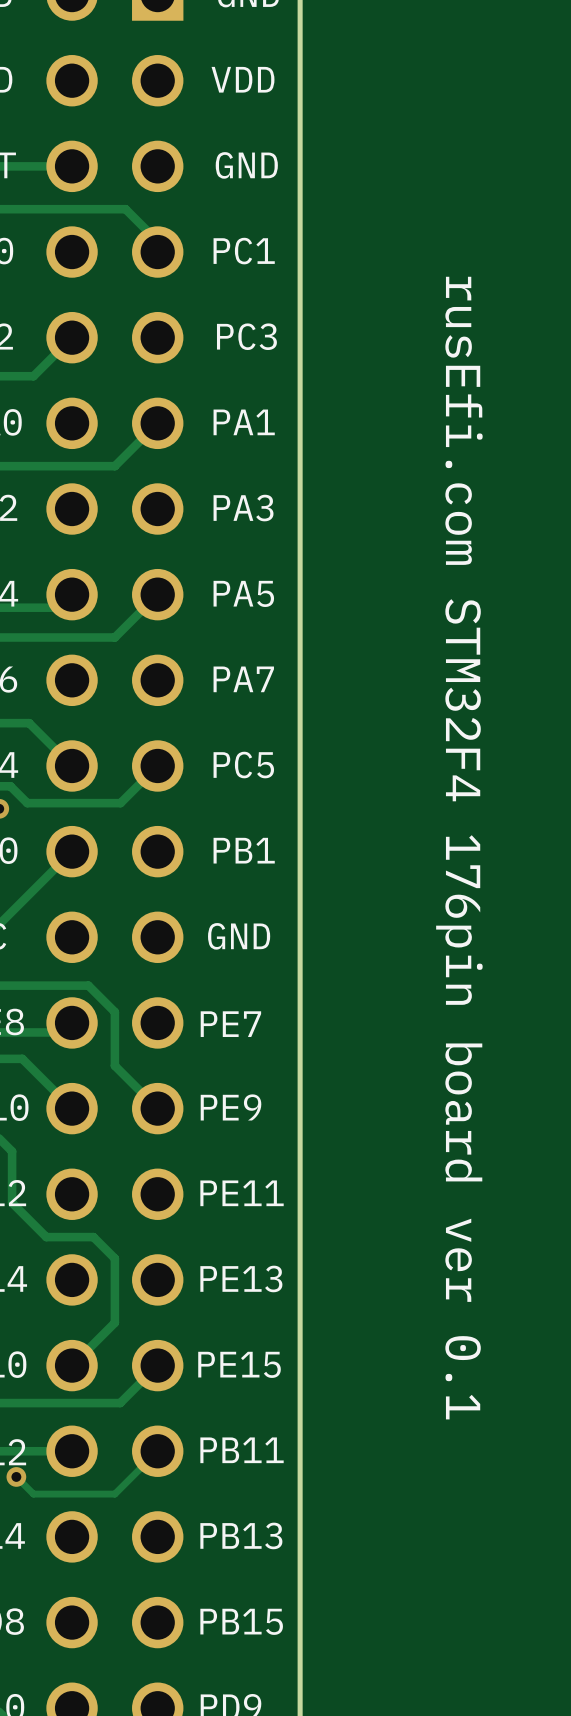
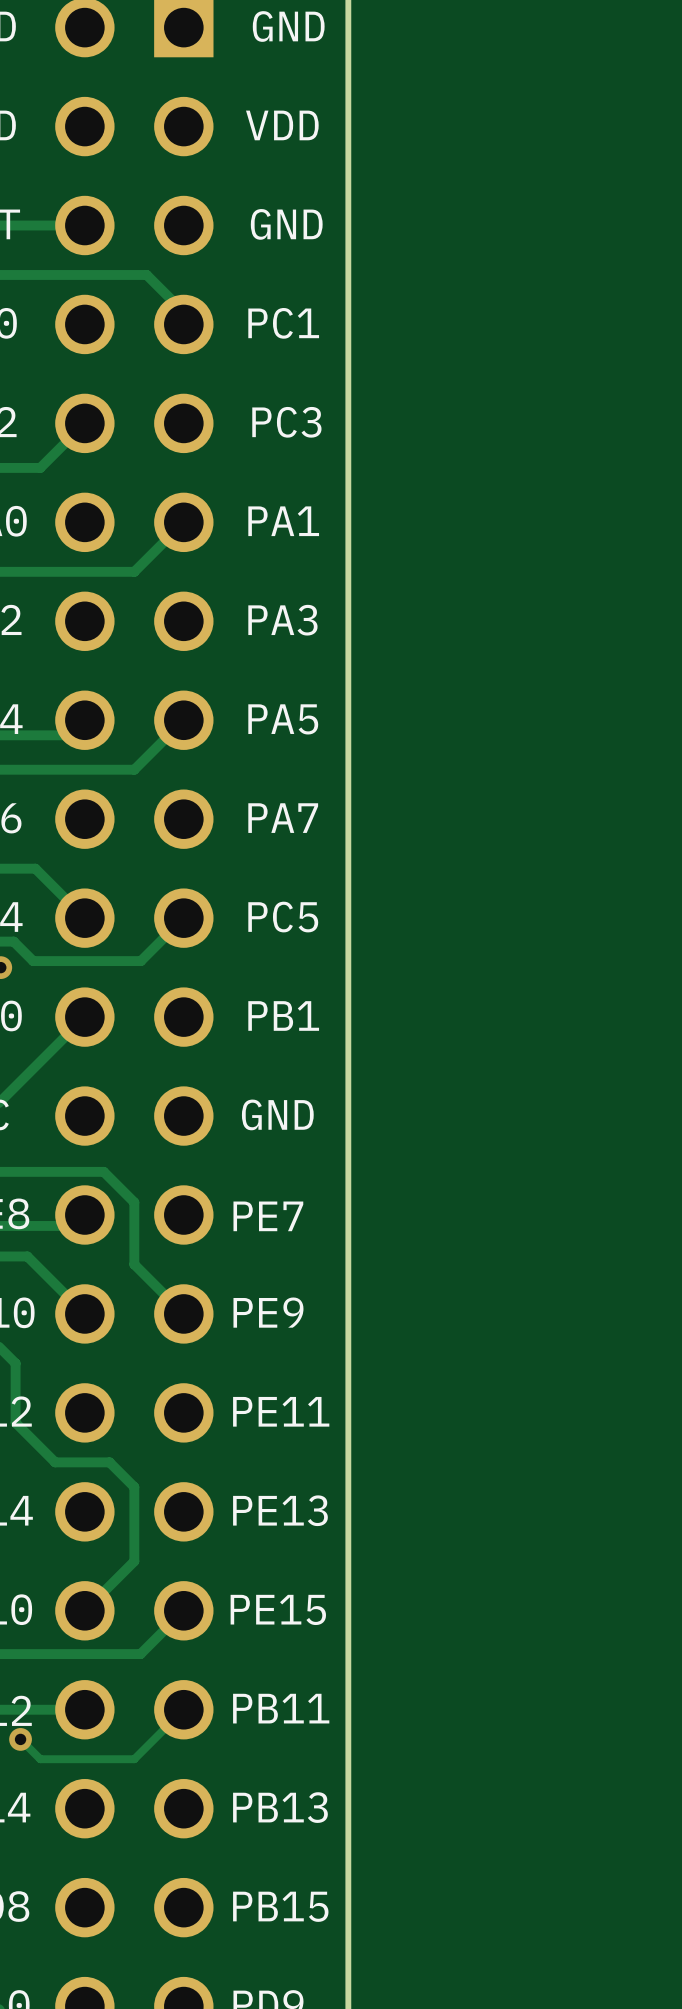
text: rusEfi.com STM32F4 176pin board ver 0.1 (459, 848) -> none

